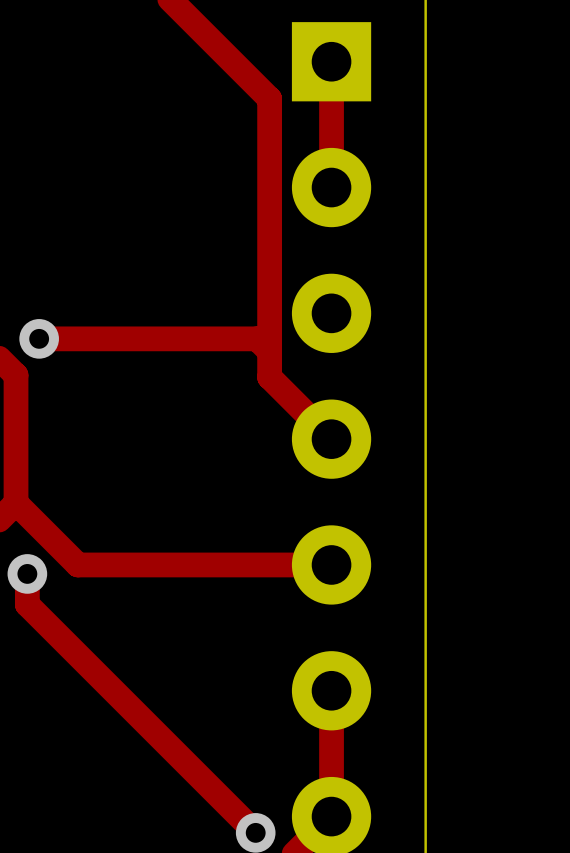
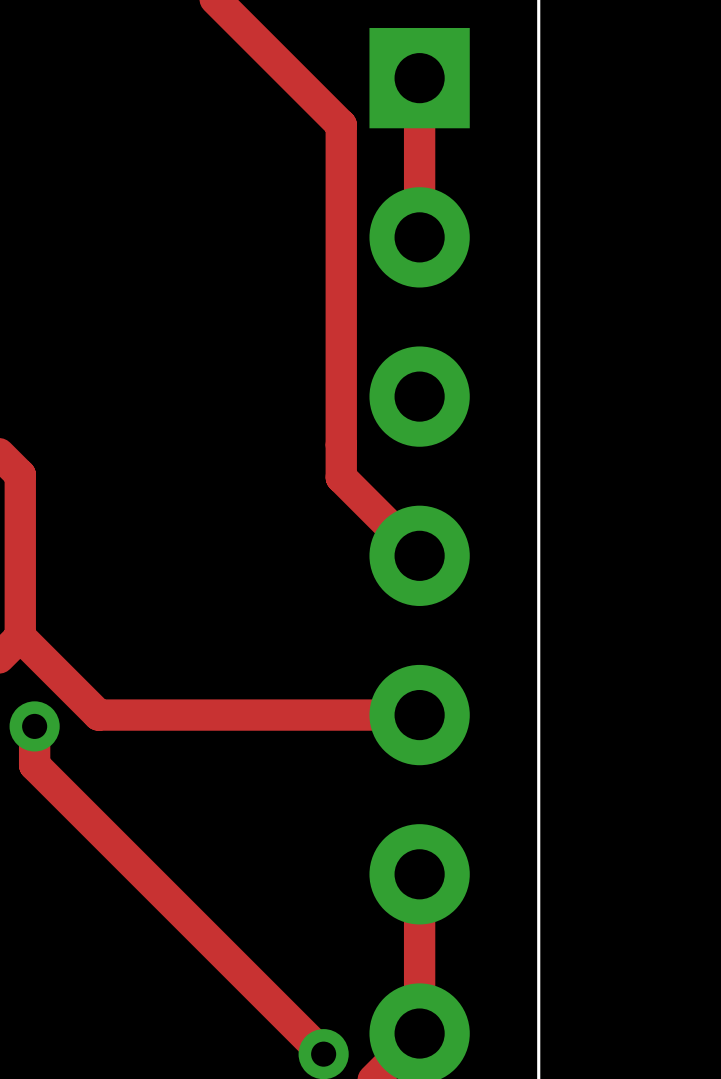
track: (39, 338) (256, 338) (269, 351) -> none
via: (39, 338) -> none

